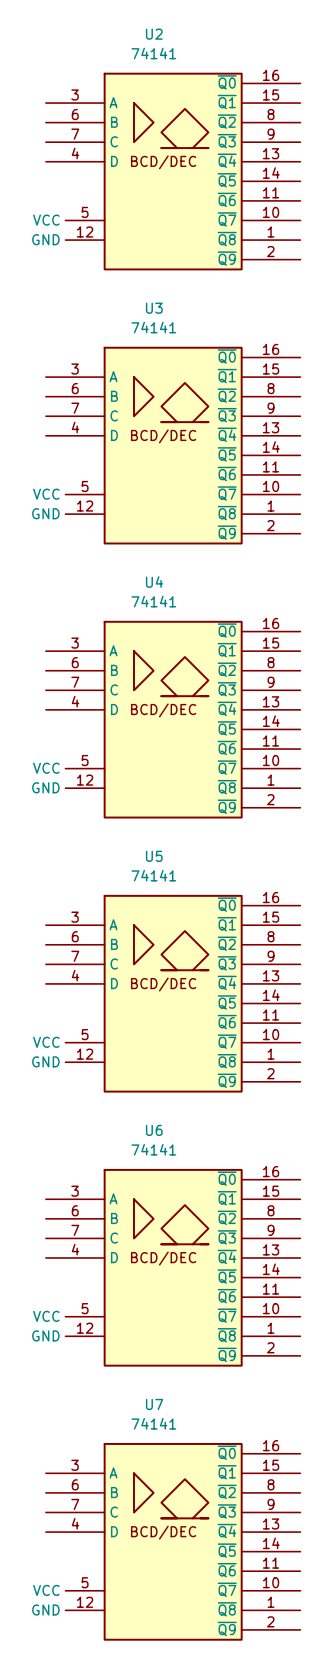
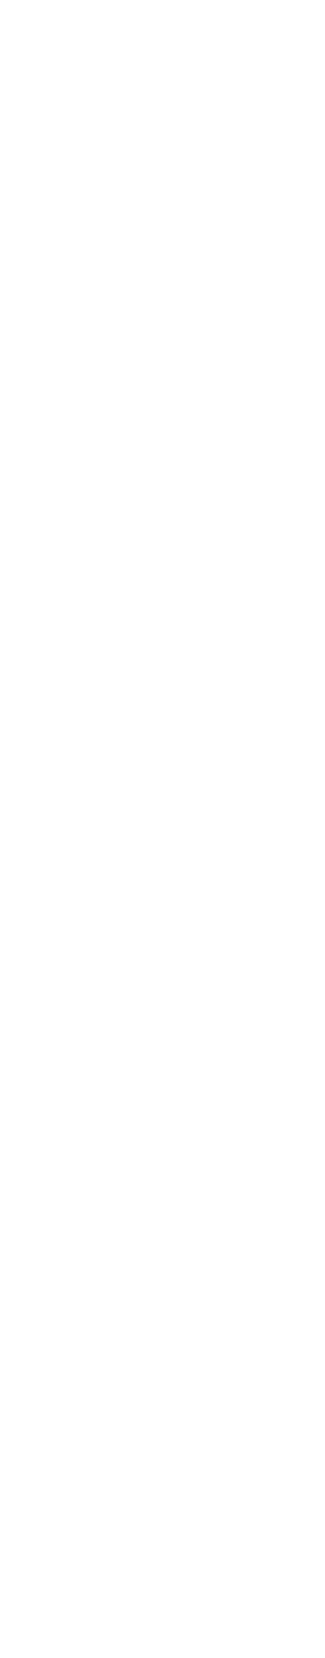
U2: 74141 (173, 171) -> none
U3: 74141 (173, 445) -> none
U4: 74141 (173, 719) -> none
U5: 74141 (173, 993) -> none
U6: 74141 (173, 1267) -> none
U7: 74141 (173, 1541) -> none

